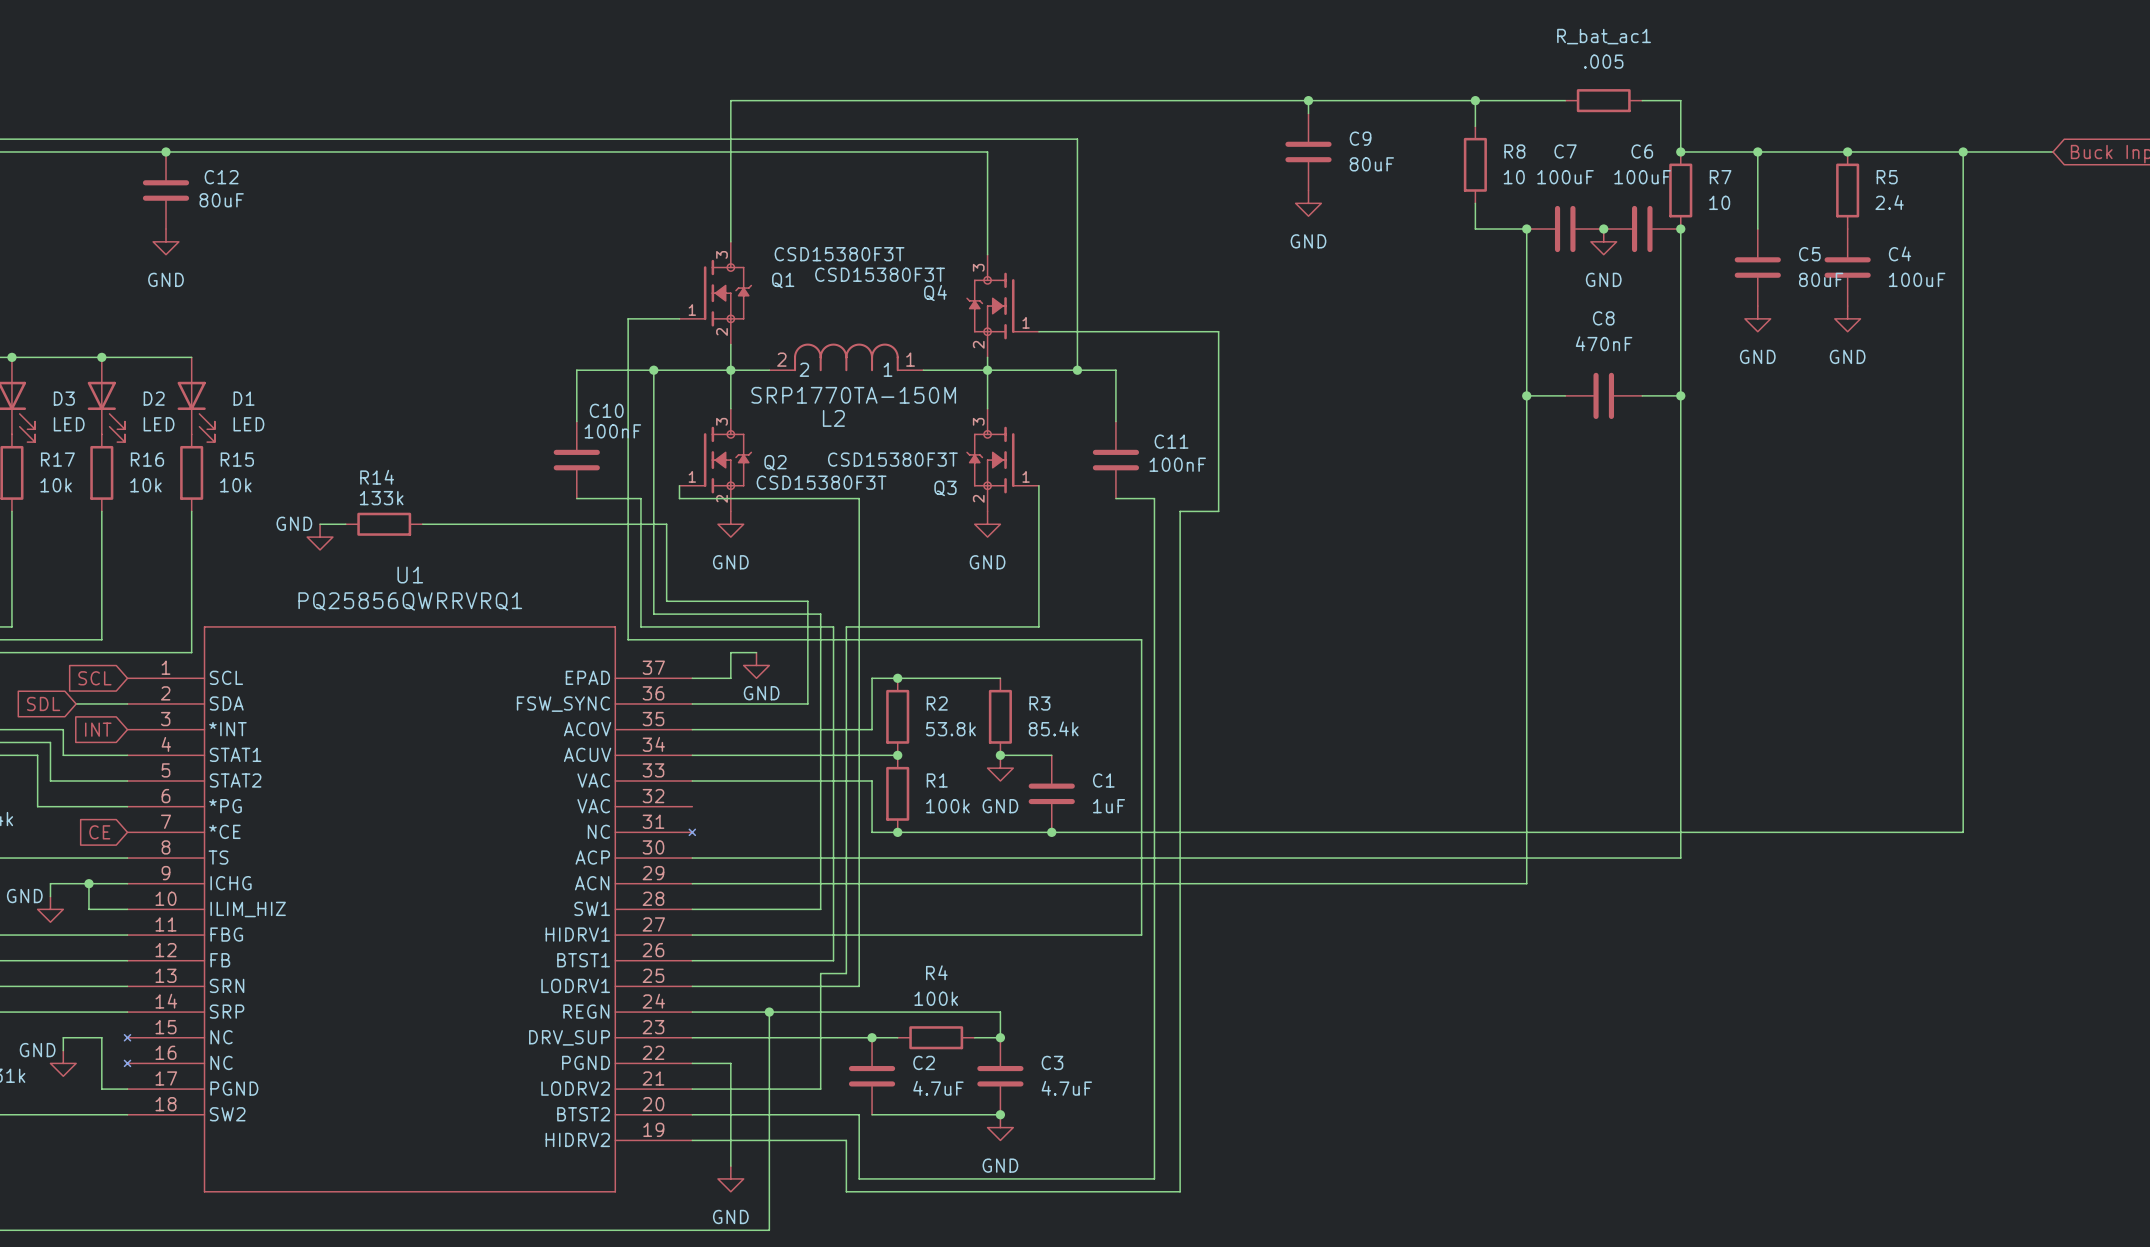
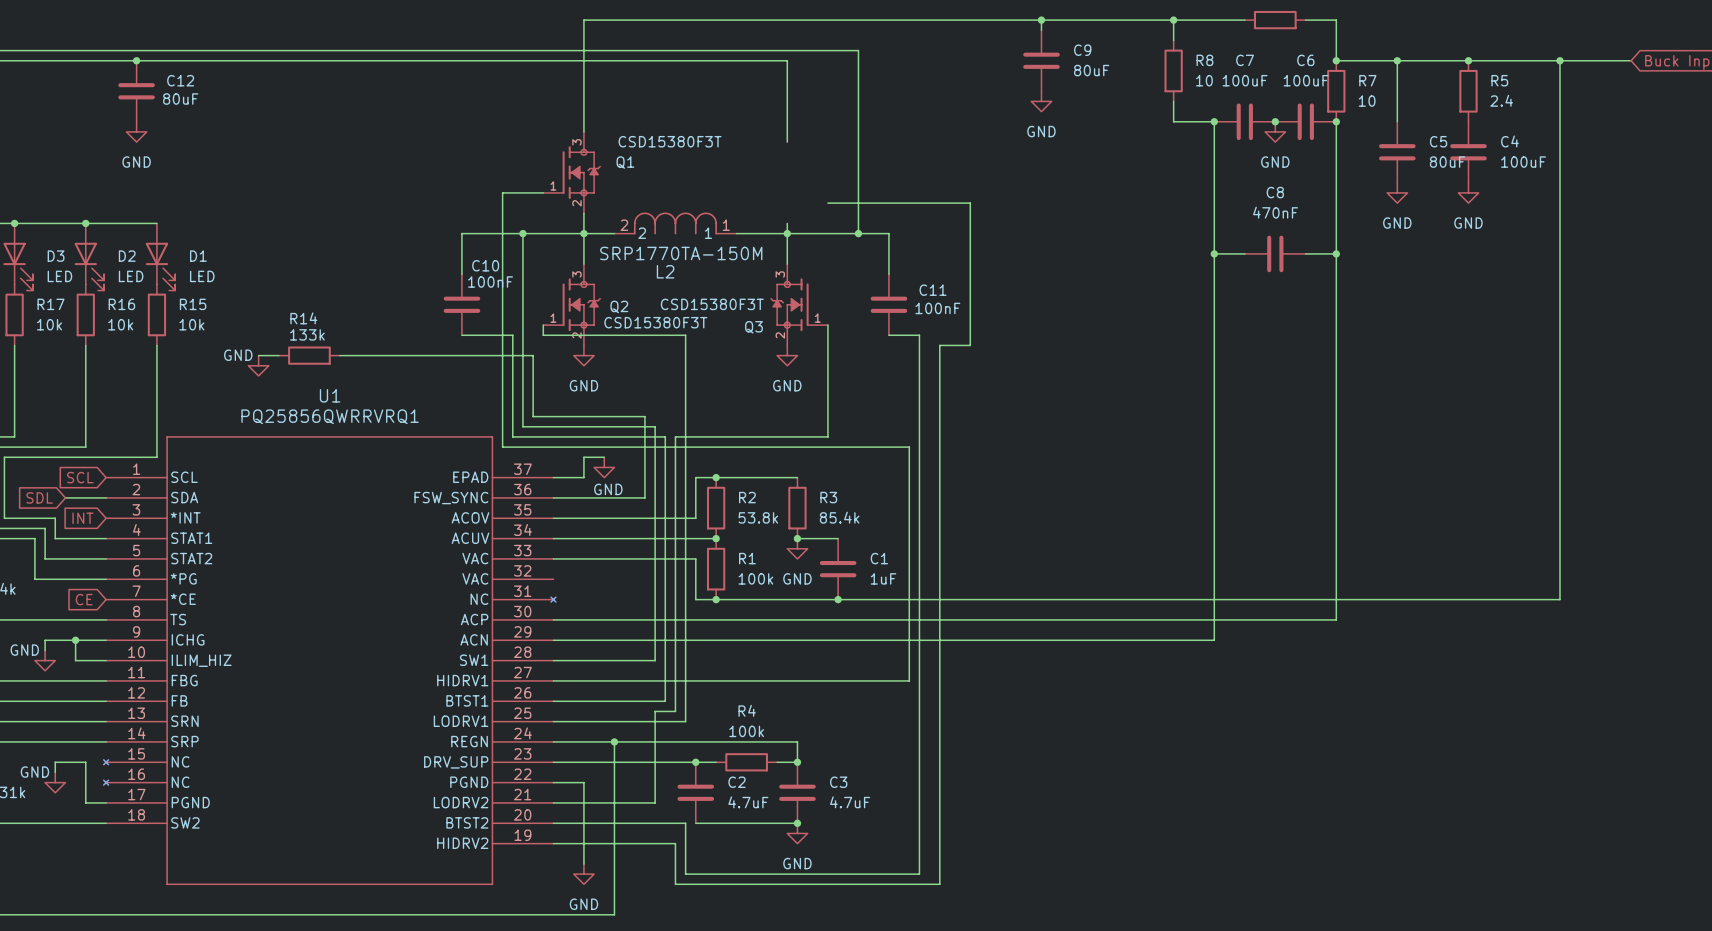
Q4: CSD15380F3T (1002, 306) -> none

